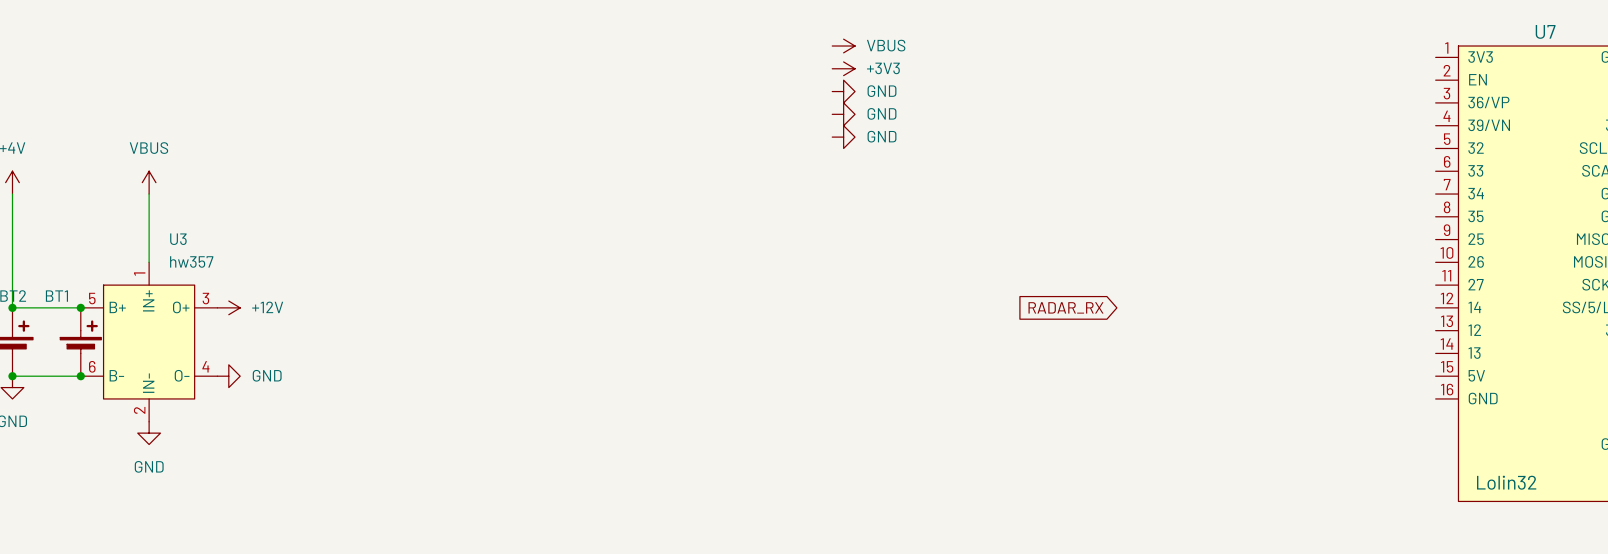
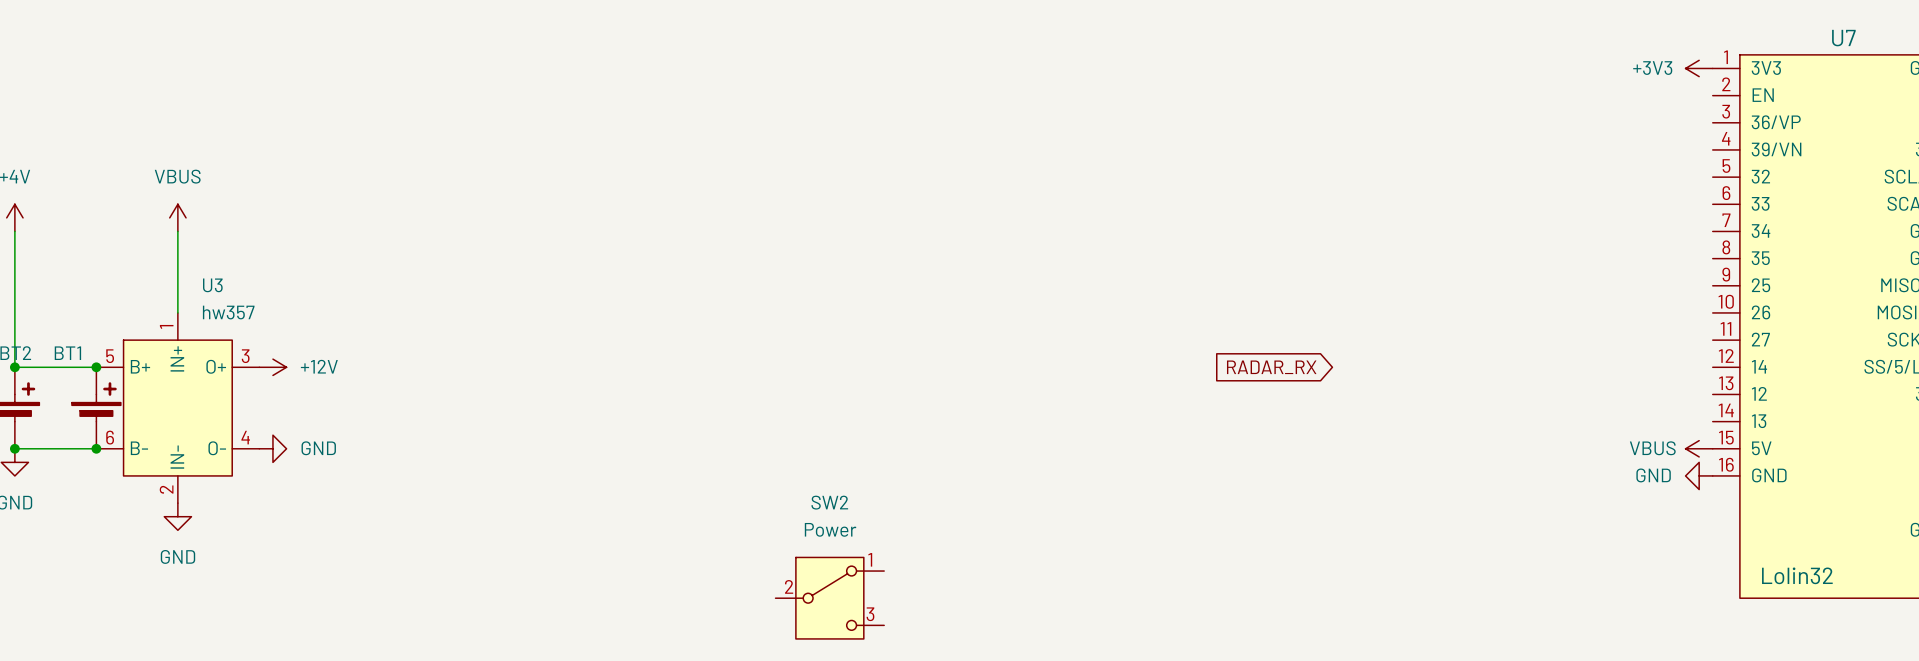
power symbol: VBUS (843, 46) -> none
power symbol: none -> +3V3 (1699, 68)
power symbol: +3V3 (843, 68) -> none
power symbol: GND (843, 91) -> none
power symbol: GND (843, 114) -> none
power symbol: GND (843, 137) -> none
power symbol: none -> VBUS (1699, 448)
power symbol: none -> GND (1699, 475)
SW2: none -> Power (829, 598)

